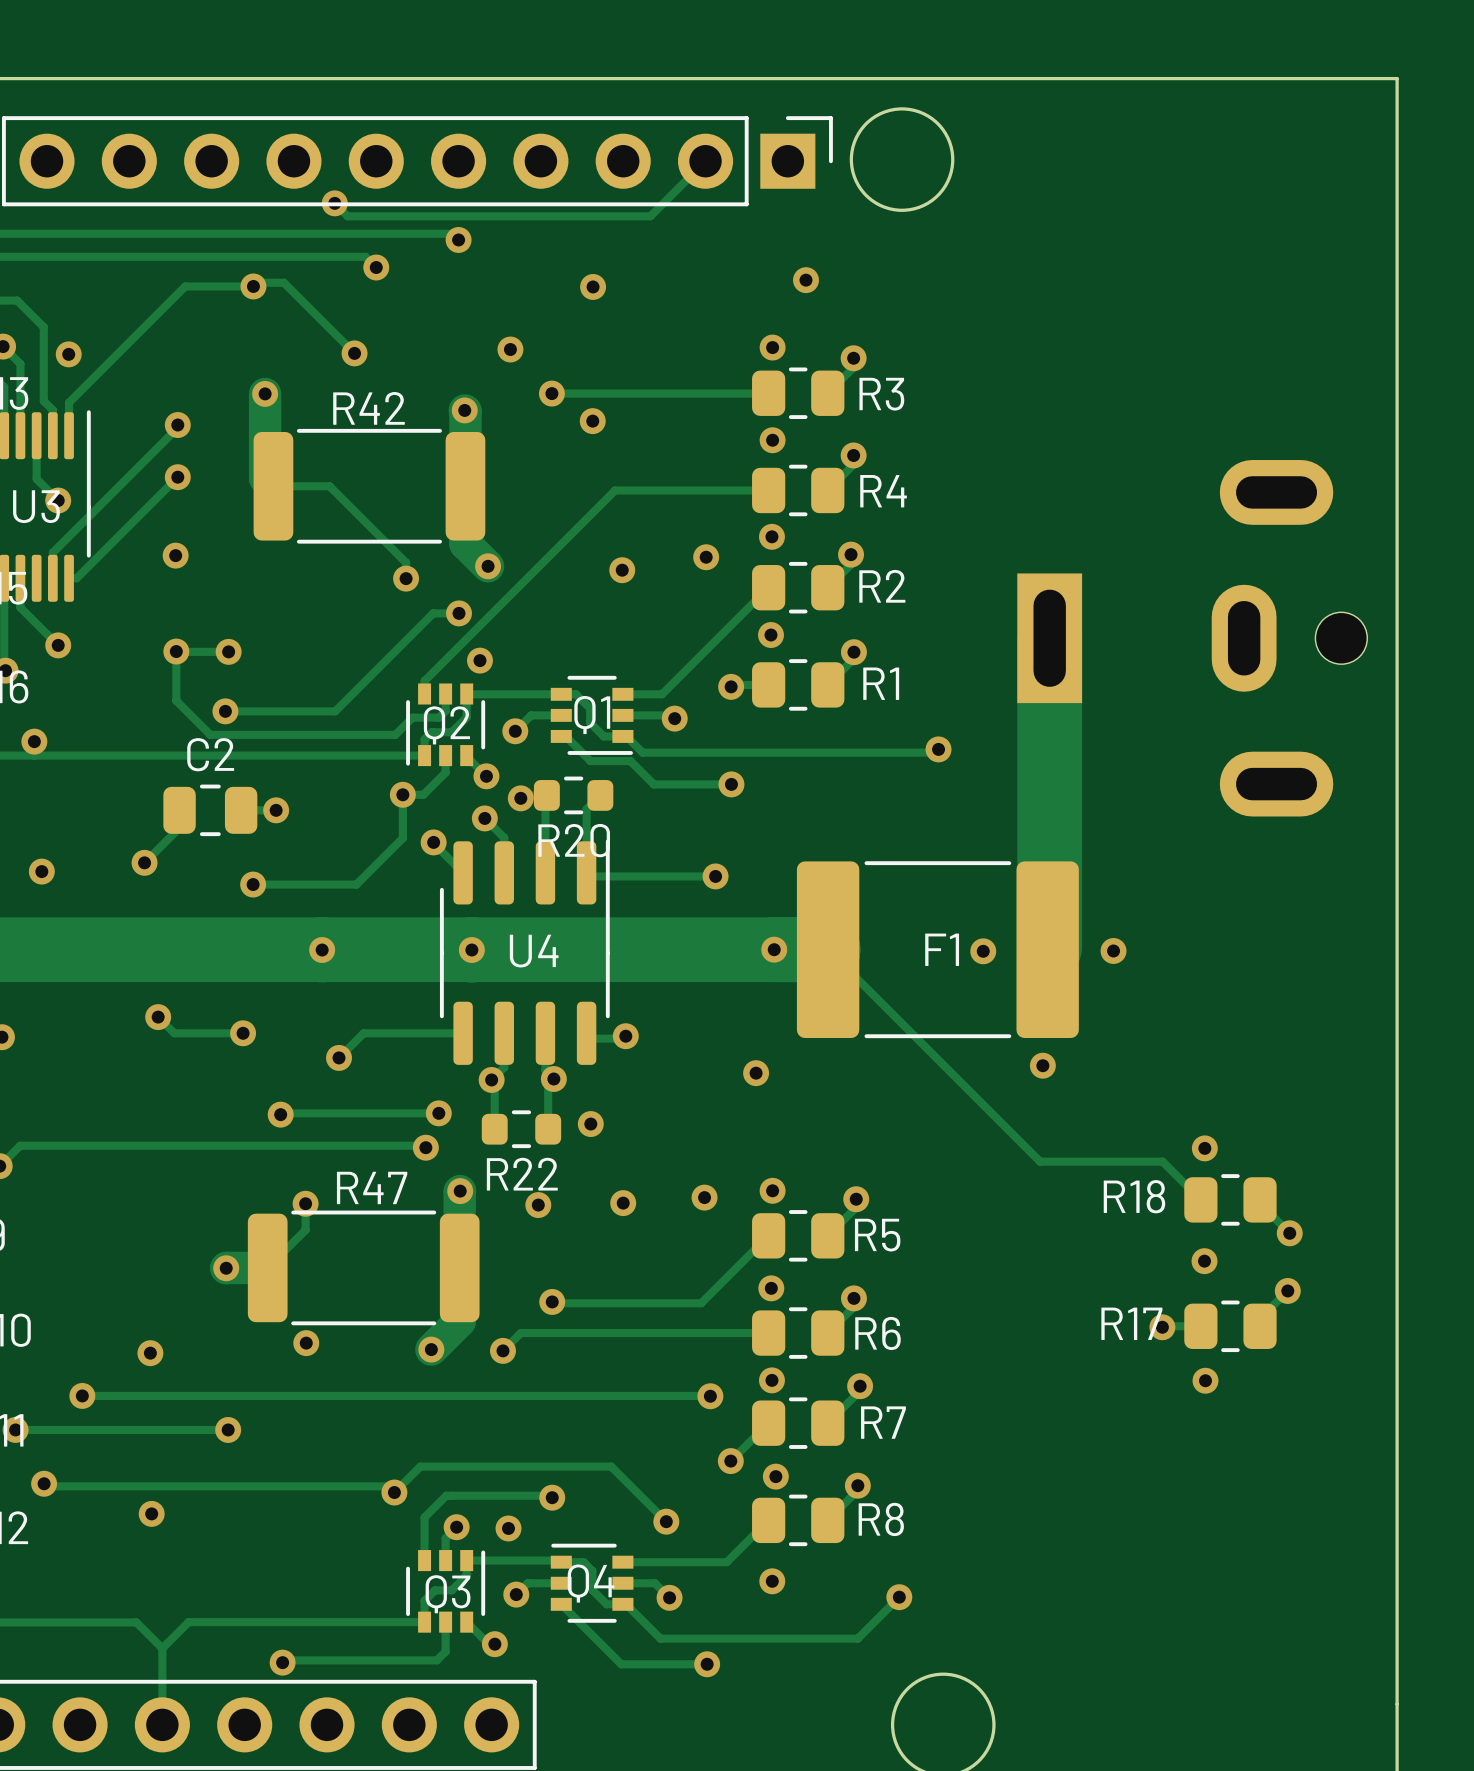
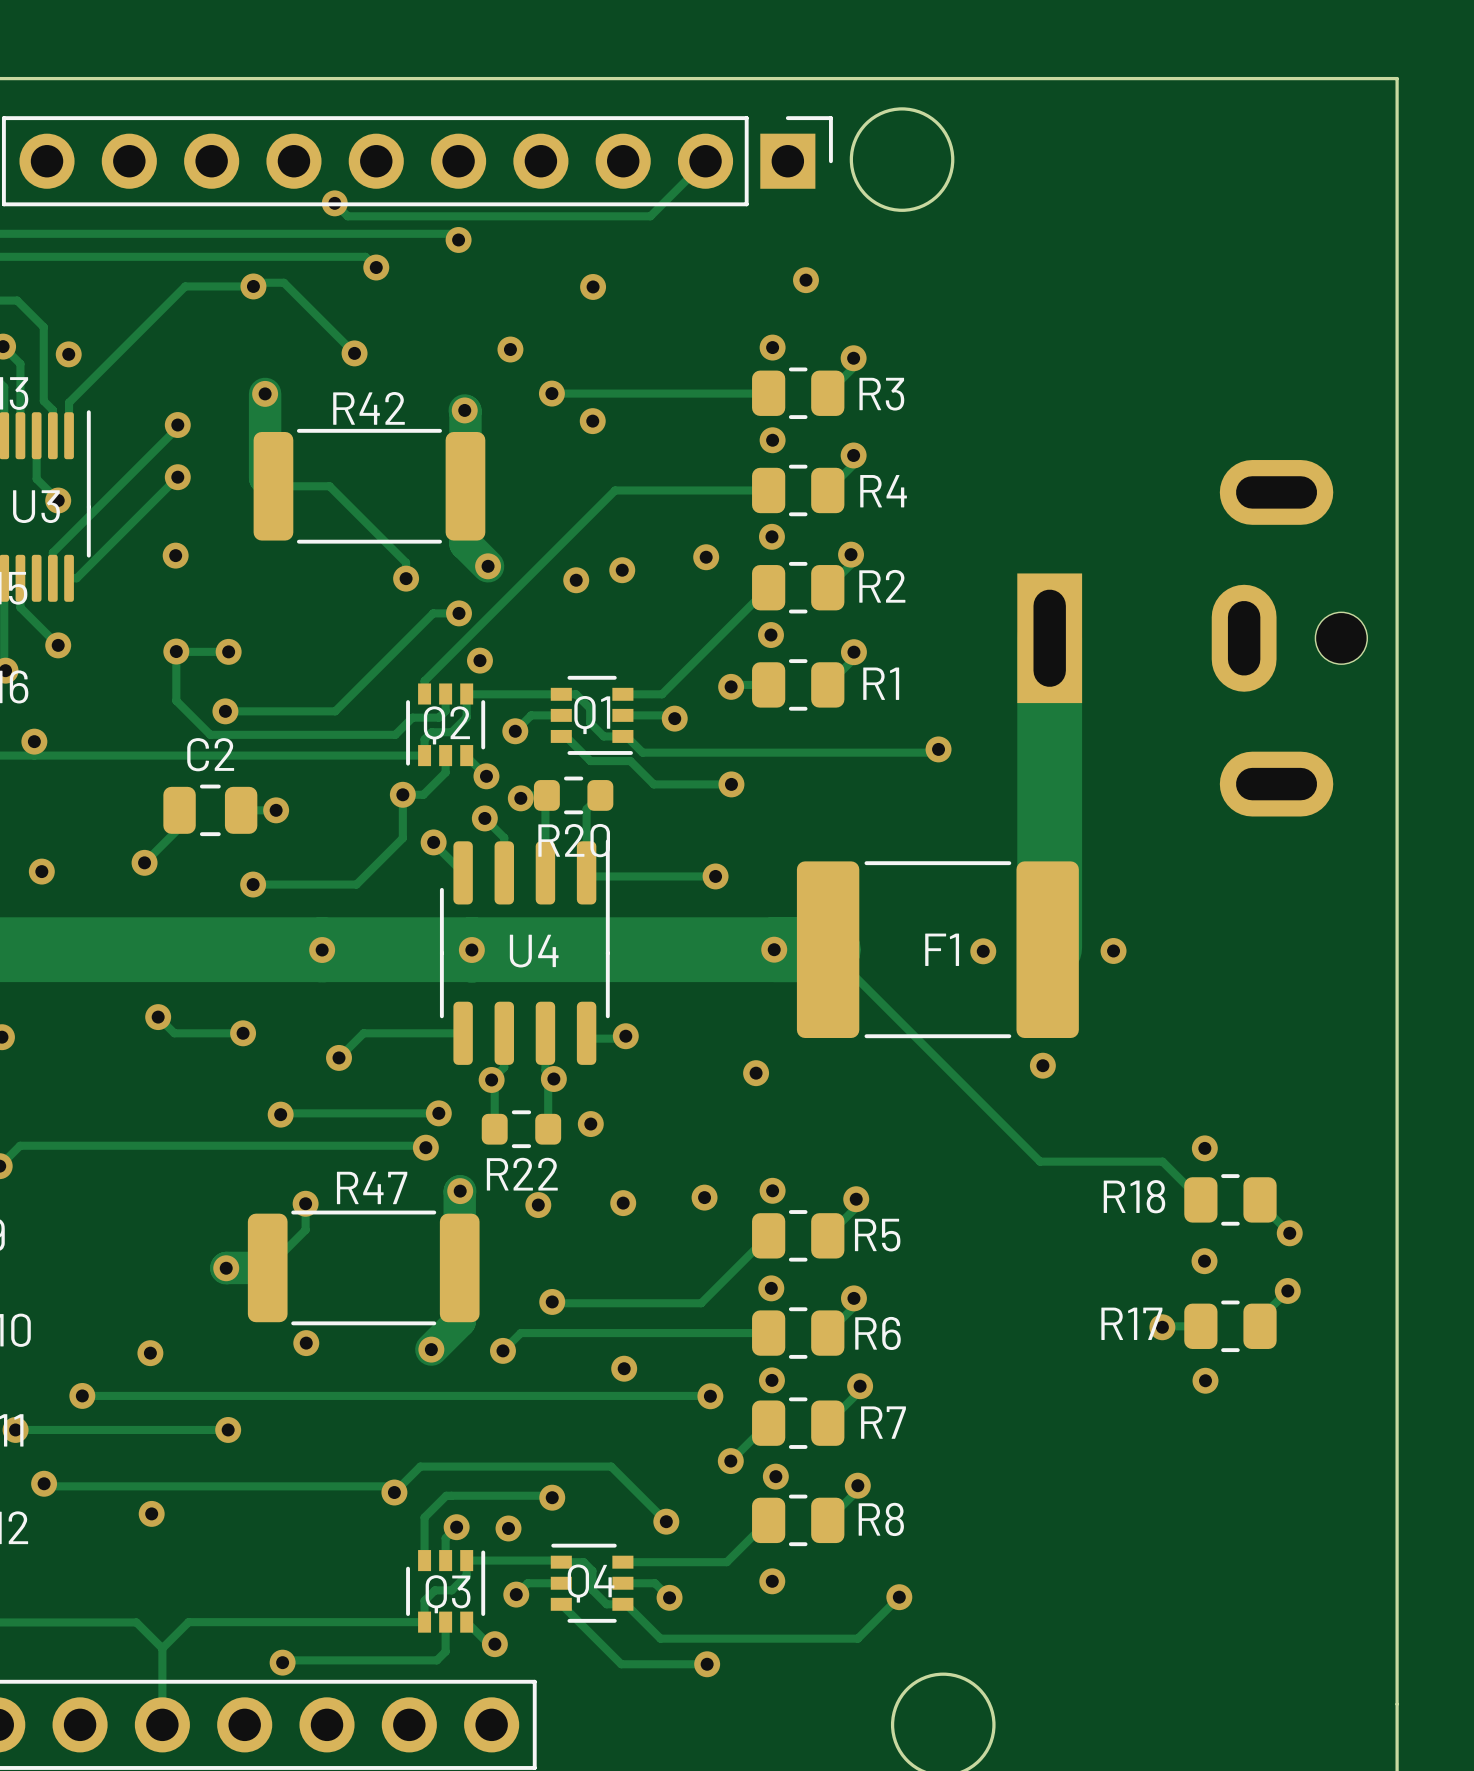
via: none -> (576, 580)
via: none -> (624, 1368)

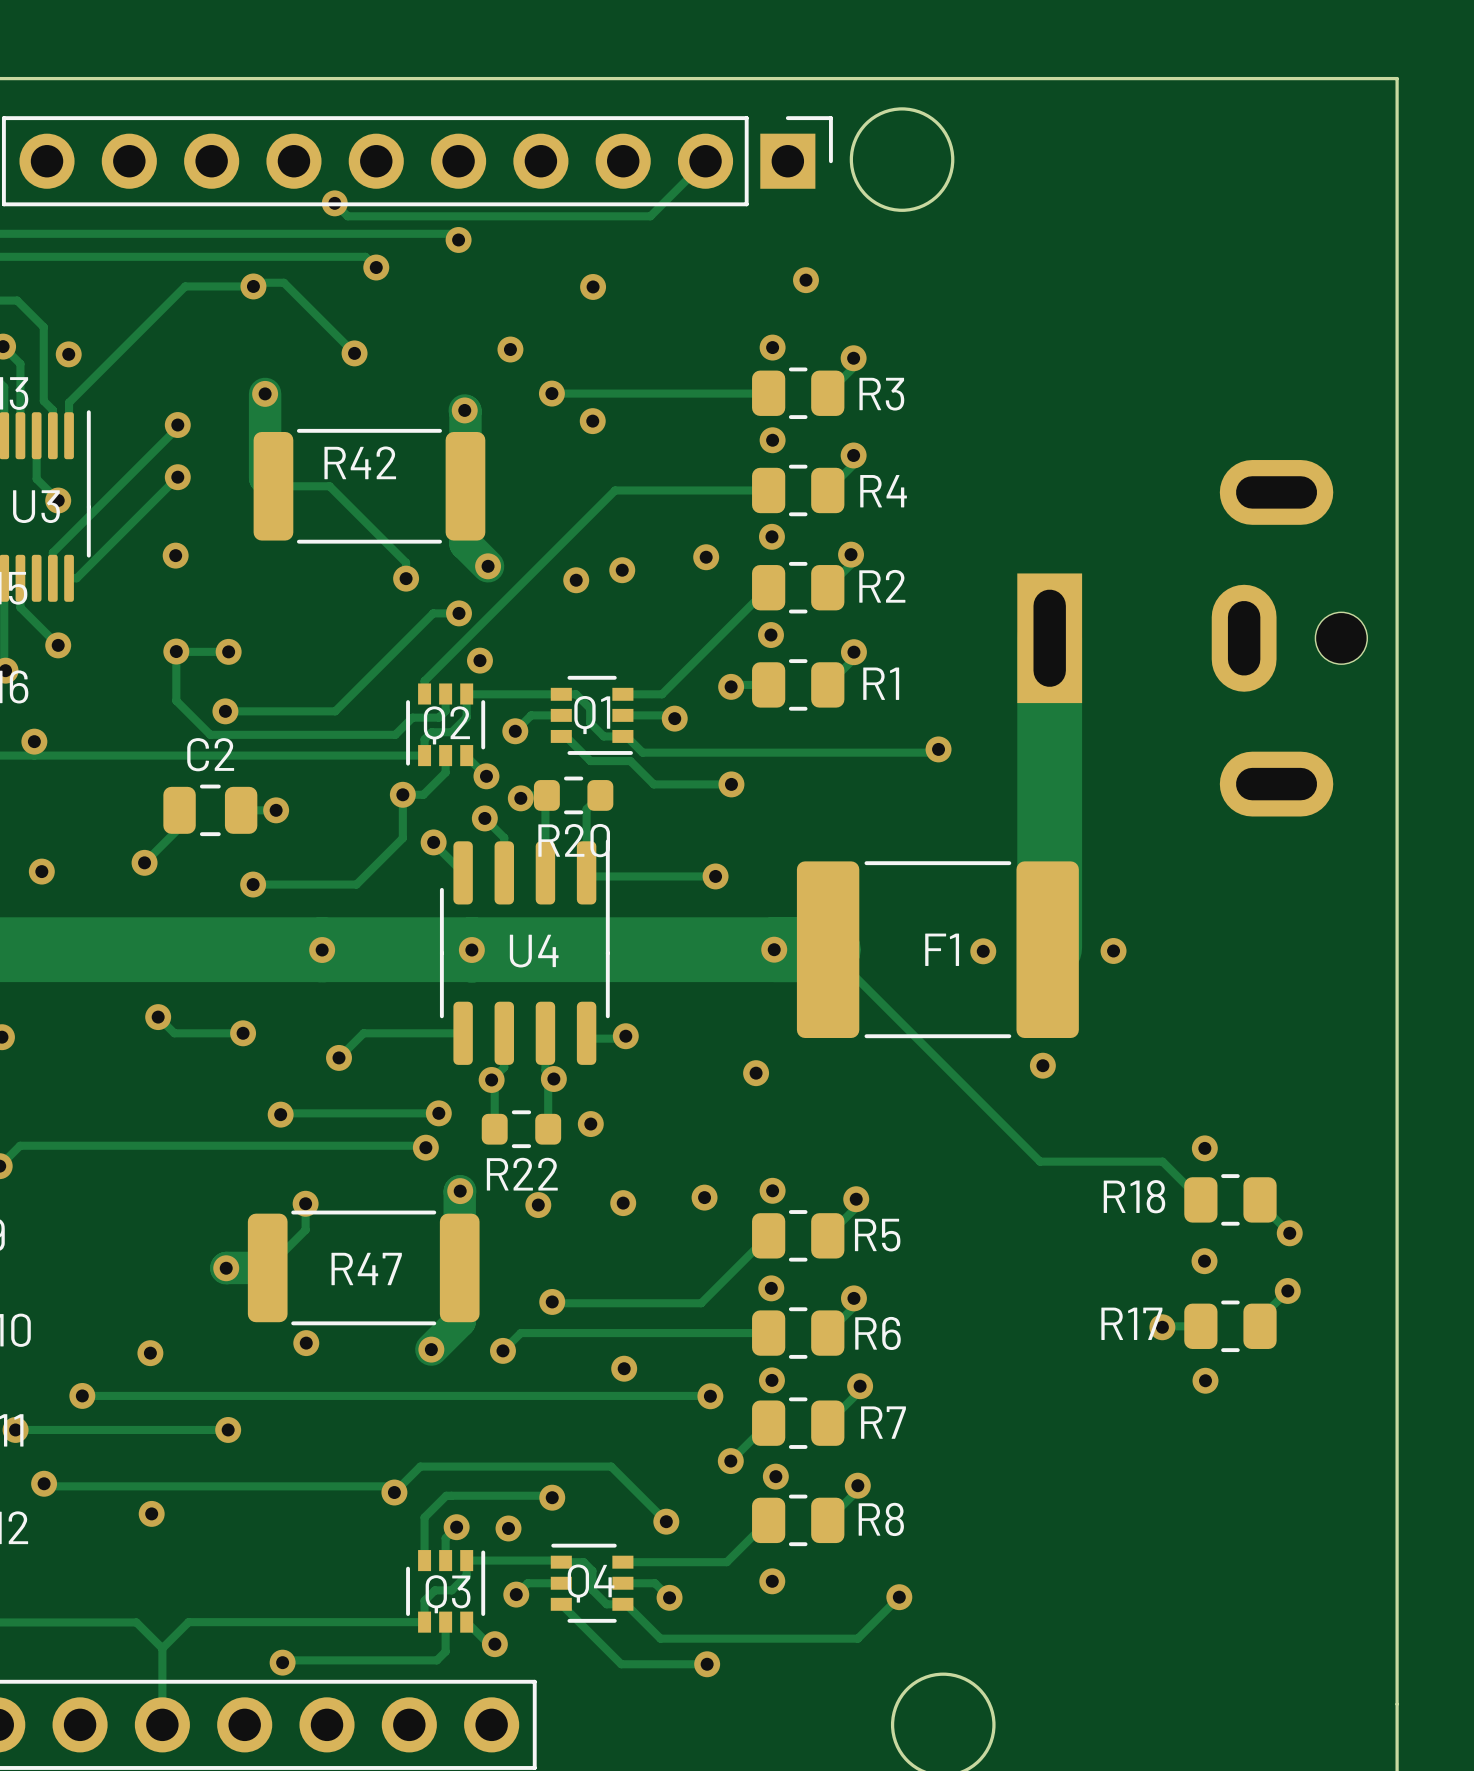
R42 name position: R42 (369, 408) -> R42 (360, 462)
R47 name position: R47 (372, 1187) -> R47 (366, 1268)

